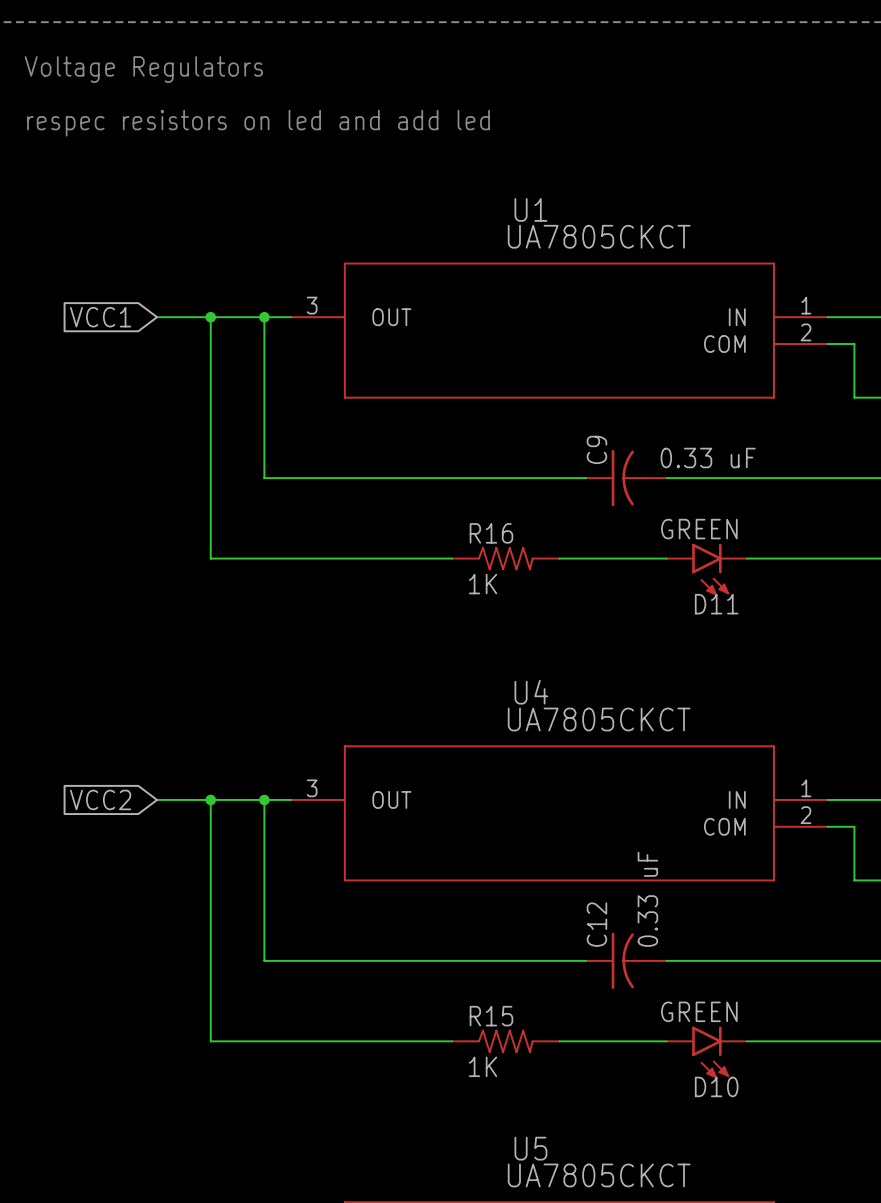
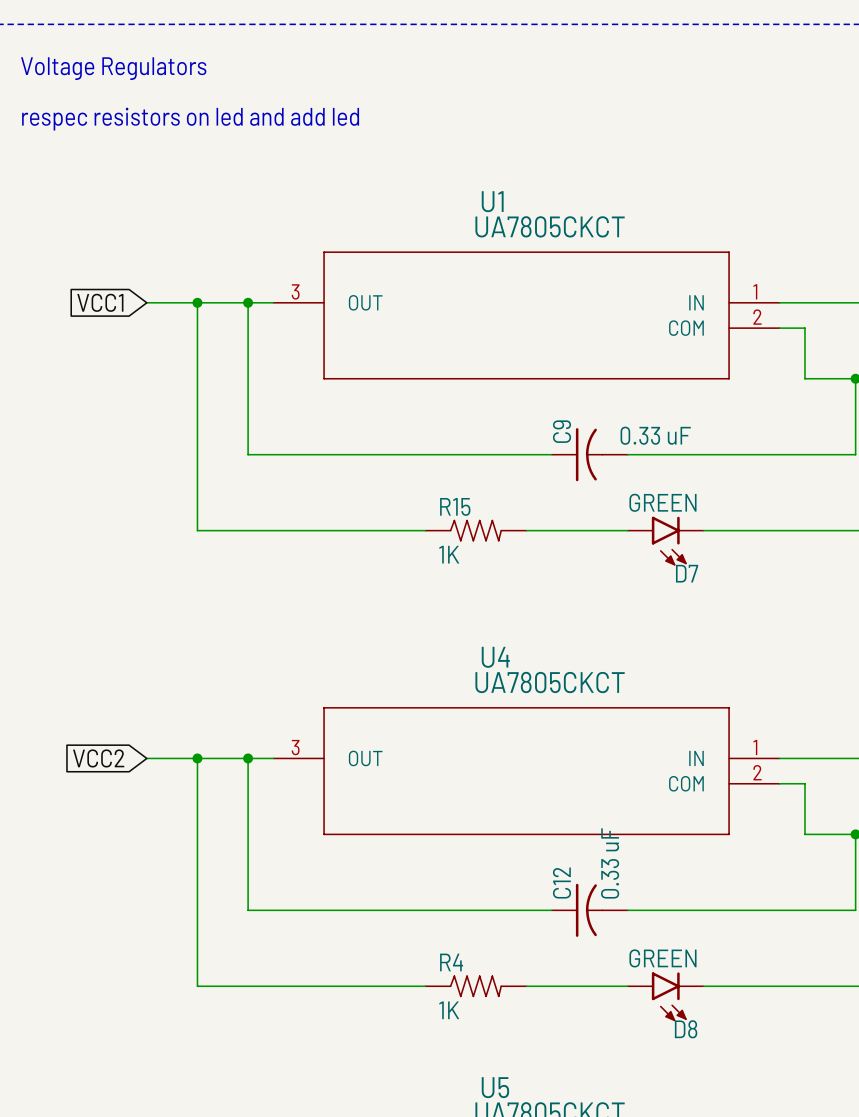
R16 name: R16 (491, 533) -> R15 (455, 506)
D11 name: D11 (716, 604) -> D7 (687, 573)
R15 name: R15 (491, 1016) -> R4 (451, 962)
D10 name: D10 (716, 1086) -> D8 (686, 1029)

